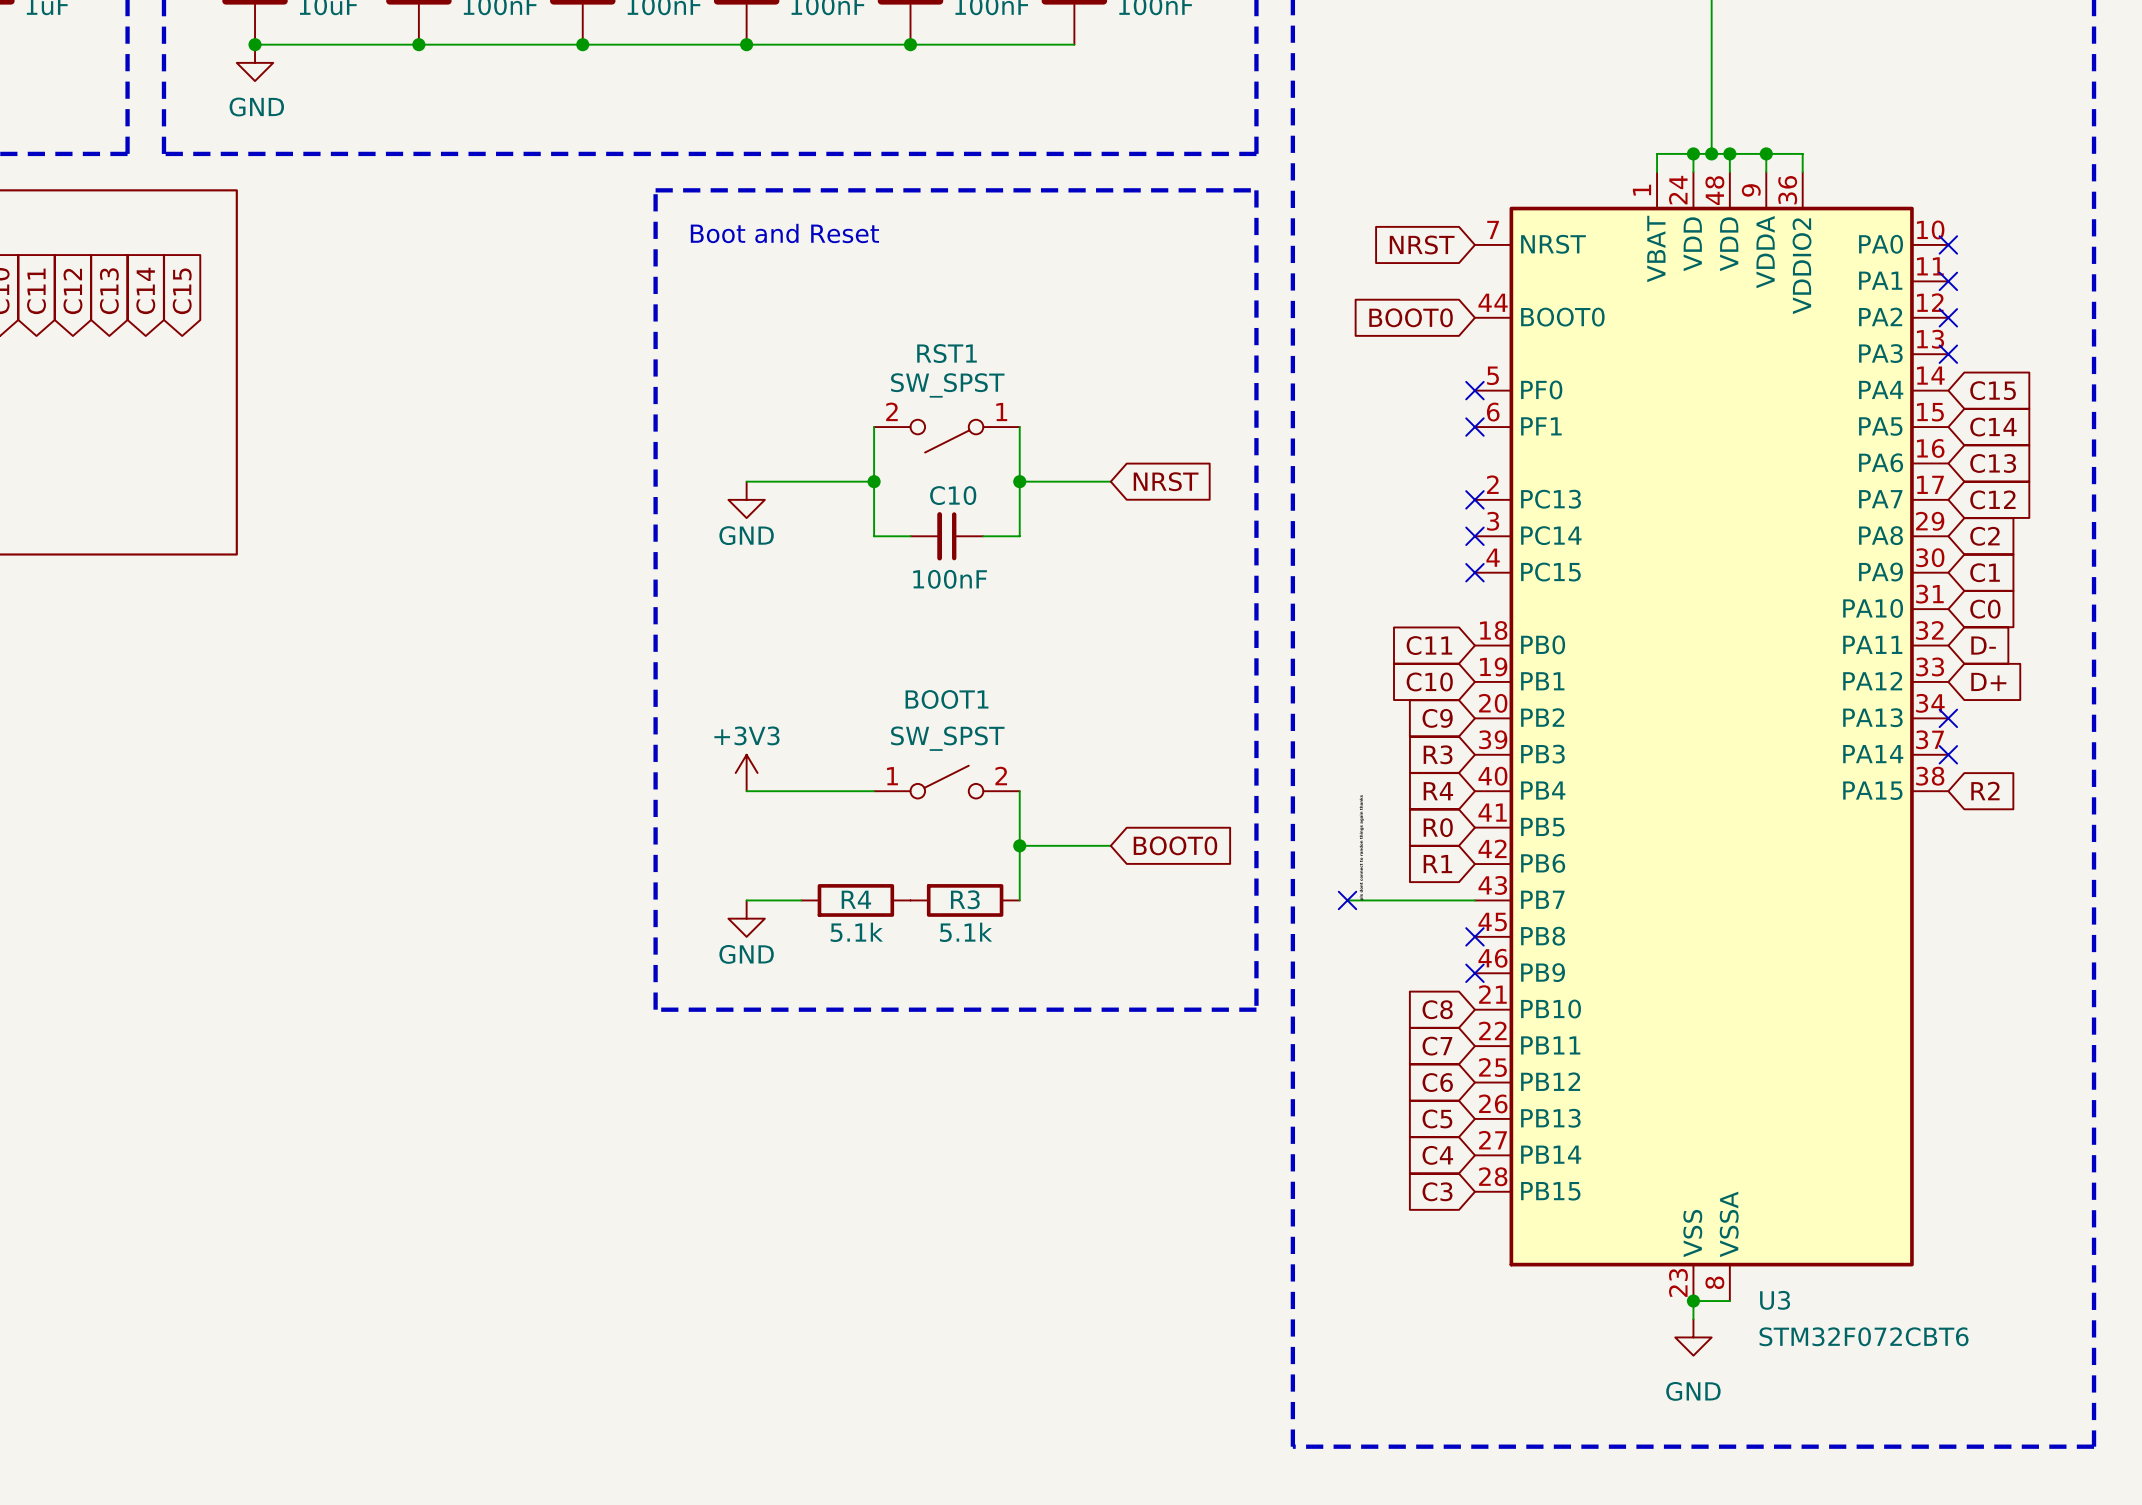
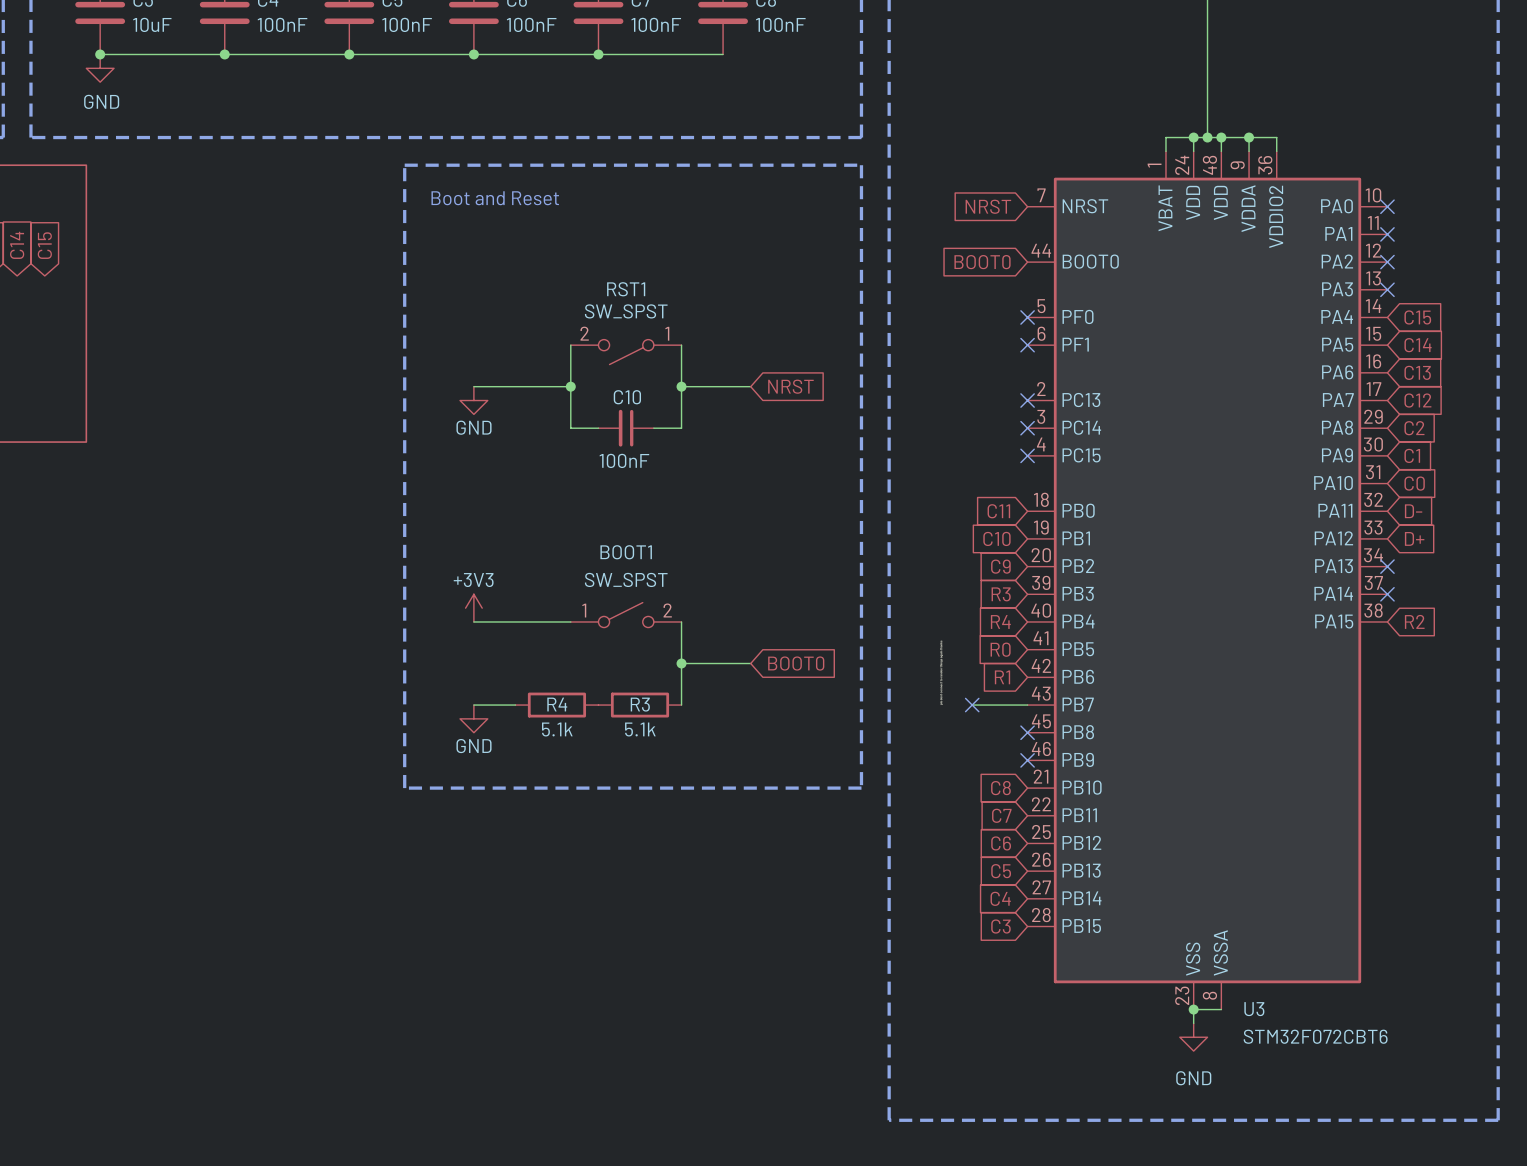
wire: (1347, 900) (1402, 900) -> none
no-connect mark position: (1347, 900) -> (972, 705)

